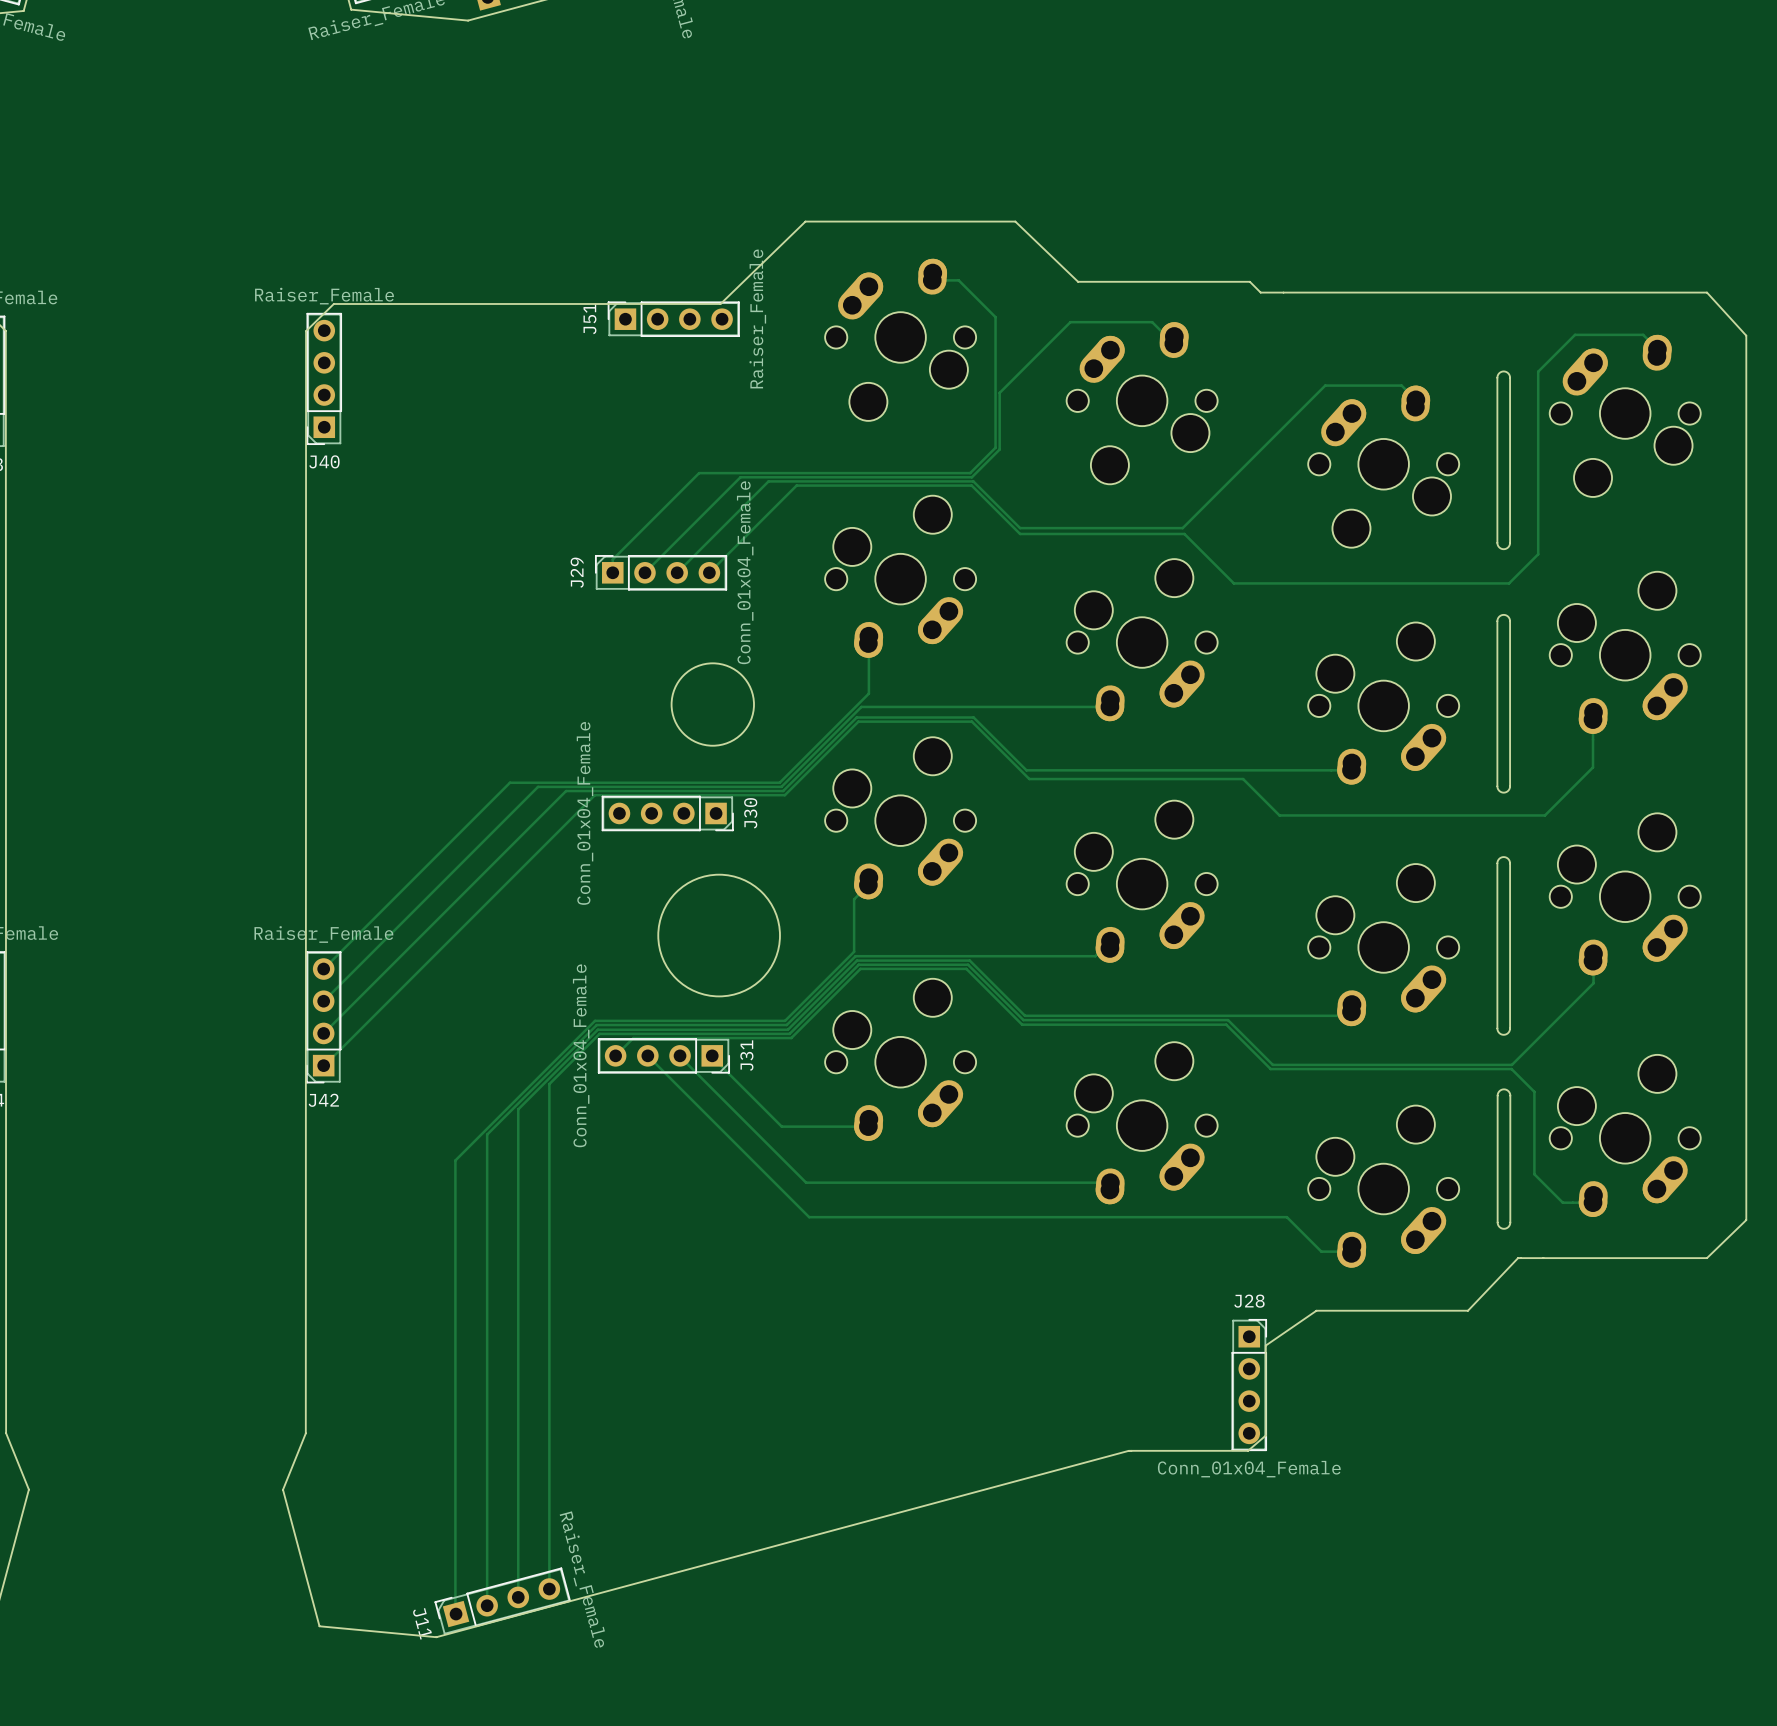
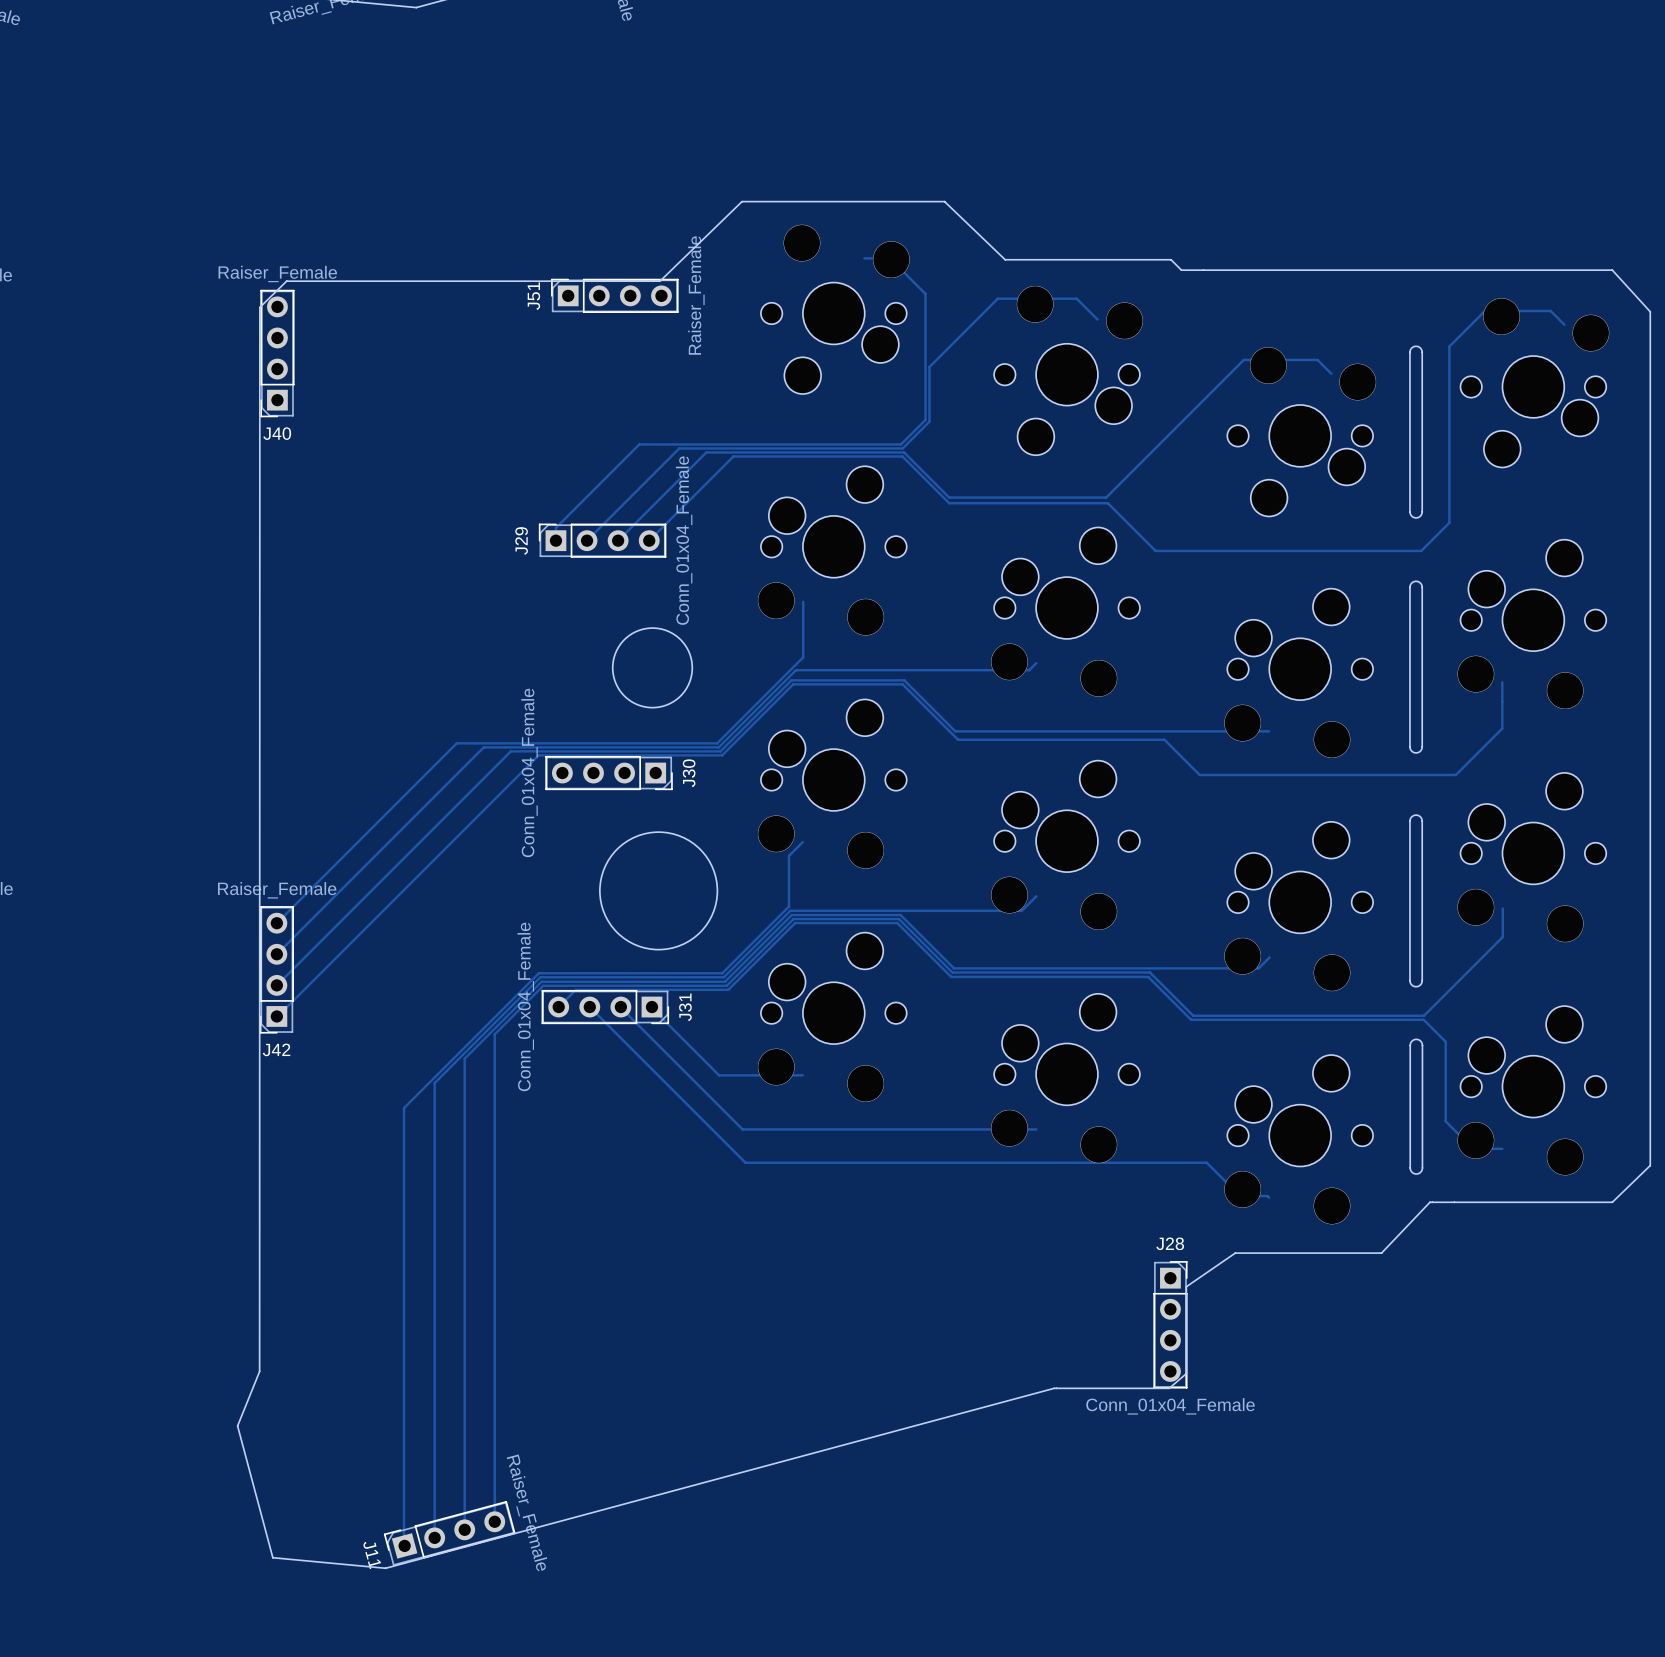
part footprint: [825, 258, 977, 421] -> [760, 224, 910, 395]
part footprint: [1066, 322, 1218, 485] -> [994, 285, 1143, 456]
part footprint: [1549, 334, 1701, 497] -> [1460, 298, 1610, 468]
part footprint: [1308, 385, 1460, 548] -> [1227, 347, 1377, 517]
part footprint: [825, 495, 977, 658] -> [757, 466, 907, 636]
part footprint: [1066, 559, 1218, 722] -> [991, 527, 1140, 697]
part footprint: [1549, 571, 1701, 734] -> [1457, 539, 1607, 709]
part footprint: [1308, 622, 1460, 785] -> [1224, 588, 1374, 758]
part footprint: [825, 737, 977, 900] -> [757, 699, 907, 869]
part footprint: [1066, 800, 1218, 963] -> [991, 760, 1140, 930]
part footprint: [1549, 813, 1701, 976] -> [1457, 772, 1607, 943]
part footprint: [1308, 864, 1460, 1027] -> [1224, 821, 1374, 992]
part footprint: [825, 978, 977, 1141] -> [757, 932, 907, 1102]
part footprint: [1066, 1042, 1218, 1205] -> [991, 993, 1140, 1164]
part footprint: [1549, 1054, 1701, 1217] -> [1457, 1006, 1607, 1176]
part footprint: [1308, 1105, 1460, 1268] -> [1224, 1055, 1374, 1225]

